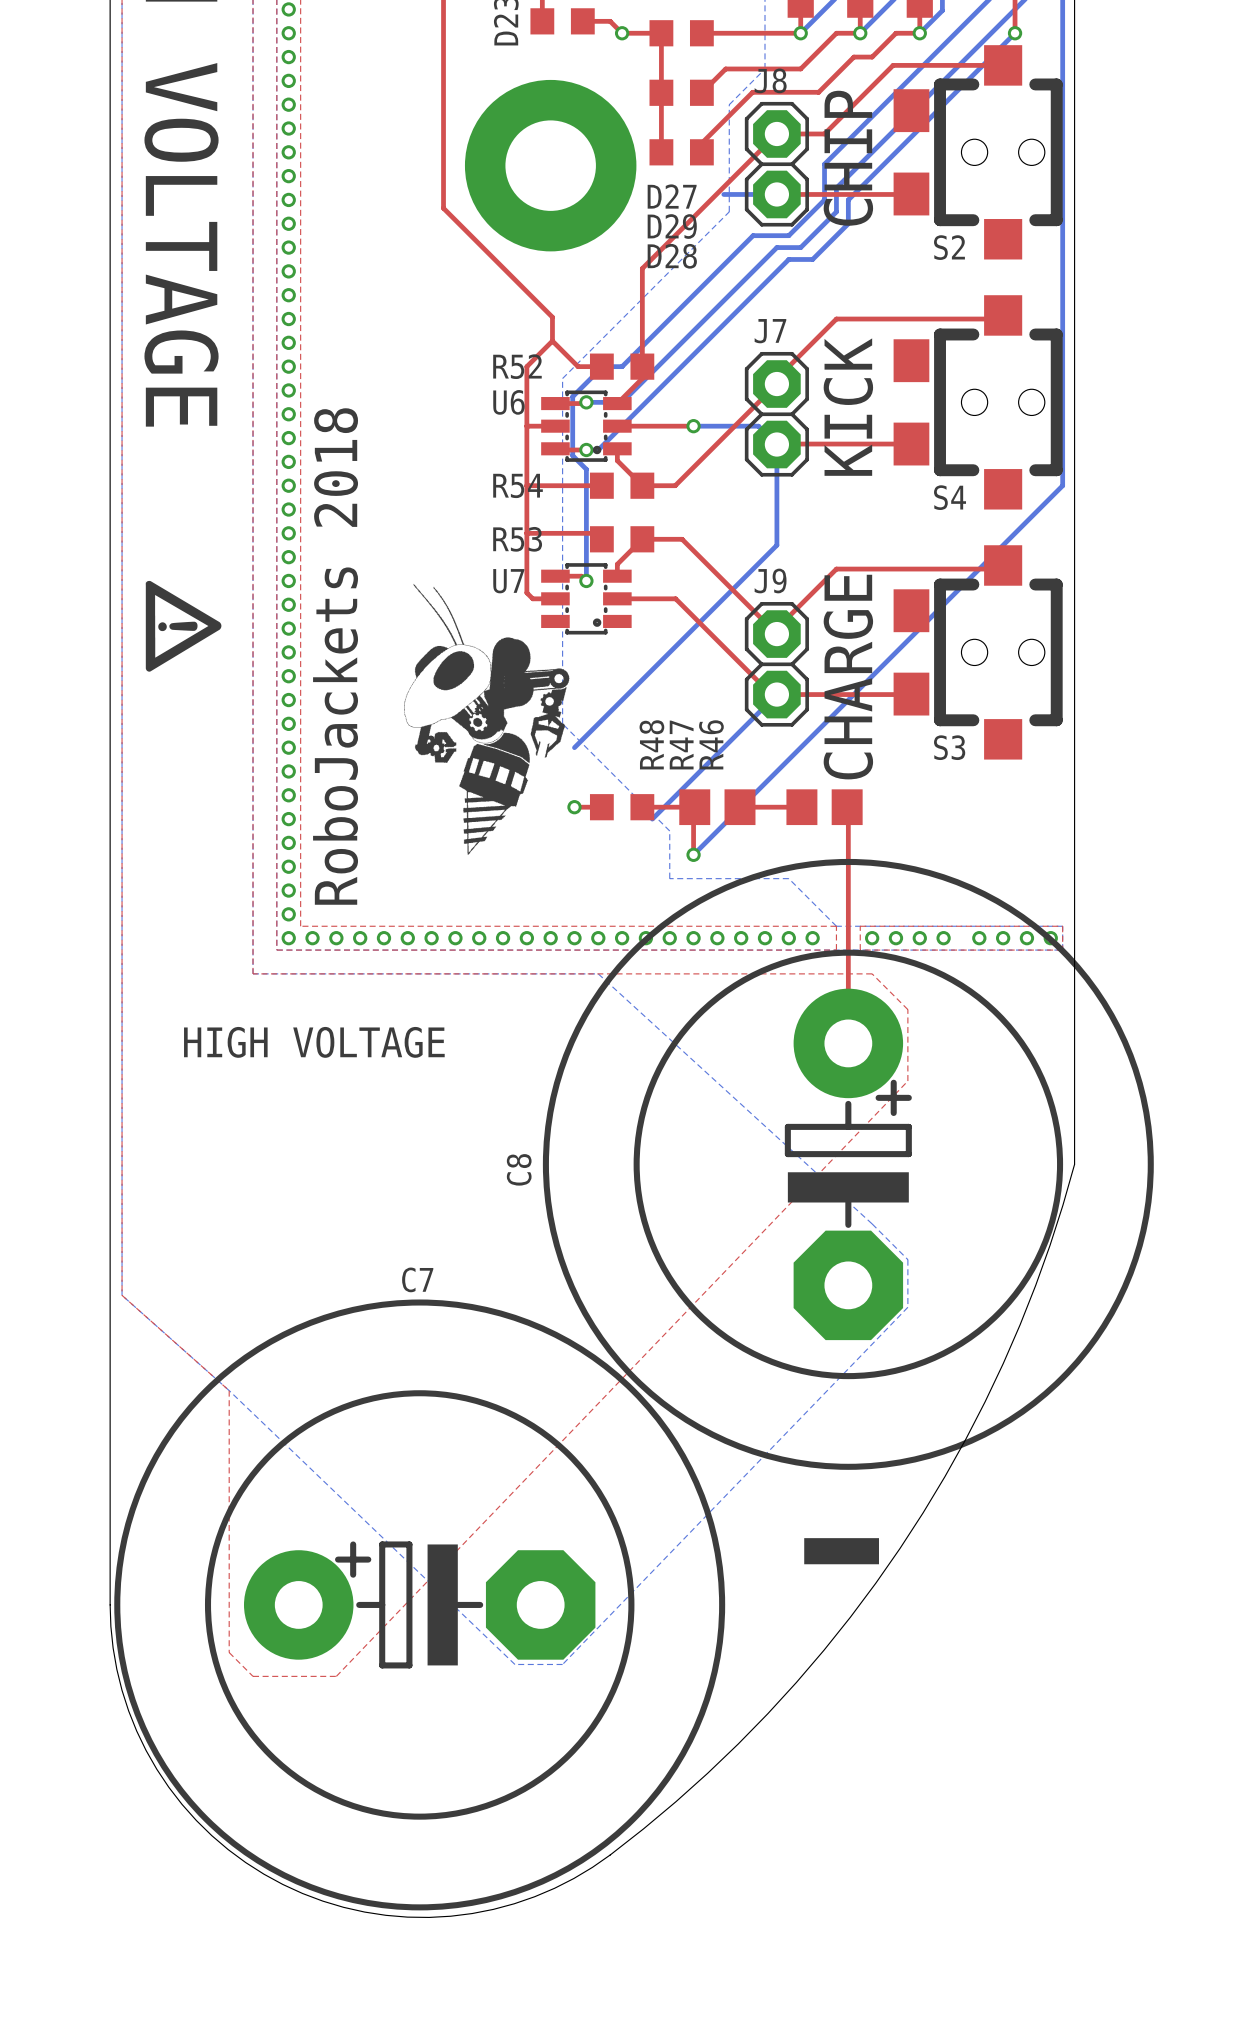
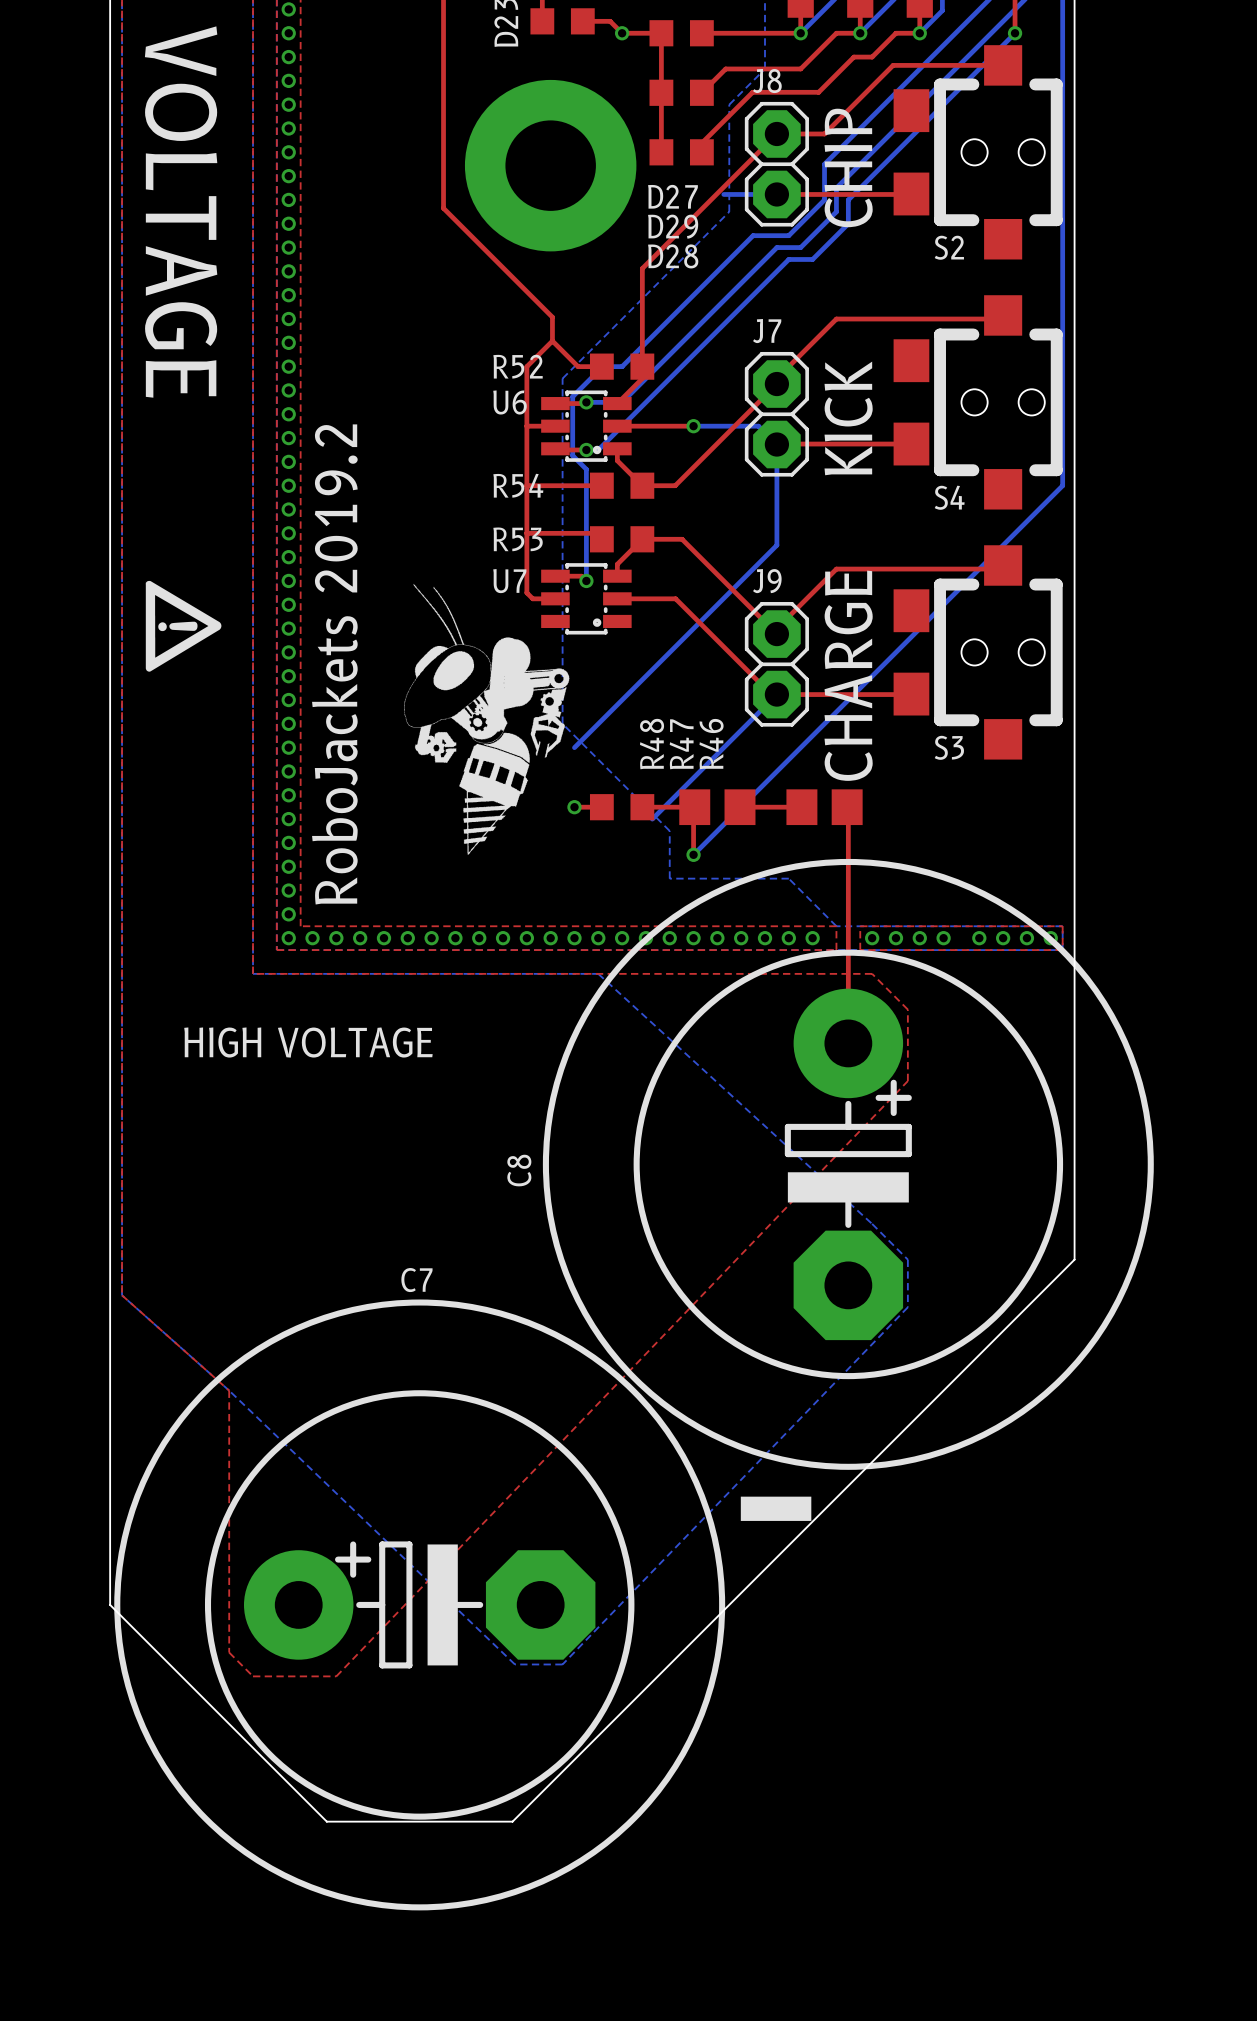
text: RoboJackets 2018 (335, 656) -> RoboJackets 2019.2 (334, 664)
board edge: (1074, 1164) (1050, 1245) (1003, 1363) (944, 1476) (875, 1583) (796, 1682) (707, 1773) (610, 1854) (554, 1888) (493, 1909) (450, 1916) (407, 1917) (364, 1912) (322, 1901) (282, 1884) (245, 1862) (196, 1820) (168, 1787) (146, 1750) (128, 1710) (116, 1669) (110, 1604) -> (1074, 1164) (1074, 1259) (512, 1821) (326, 1821) (110, 1604)
text position: - (841, 1551) -> - (776, 1508)

